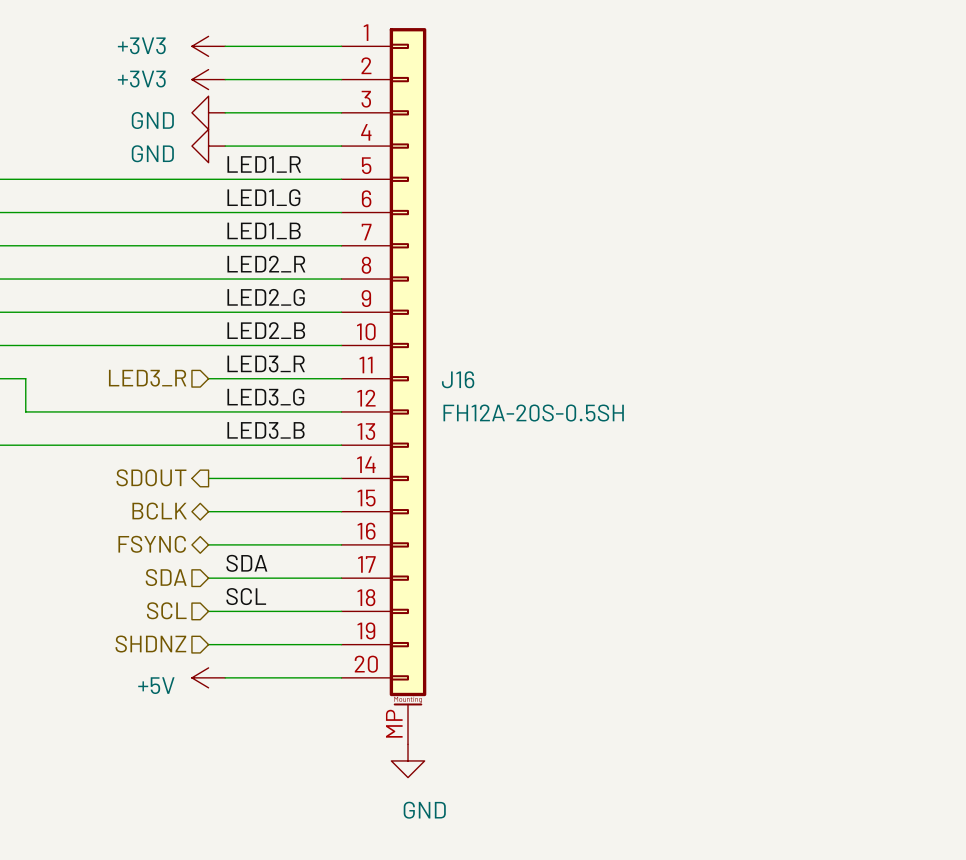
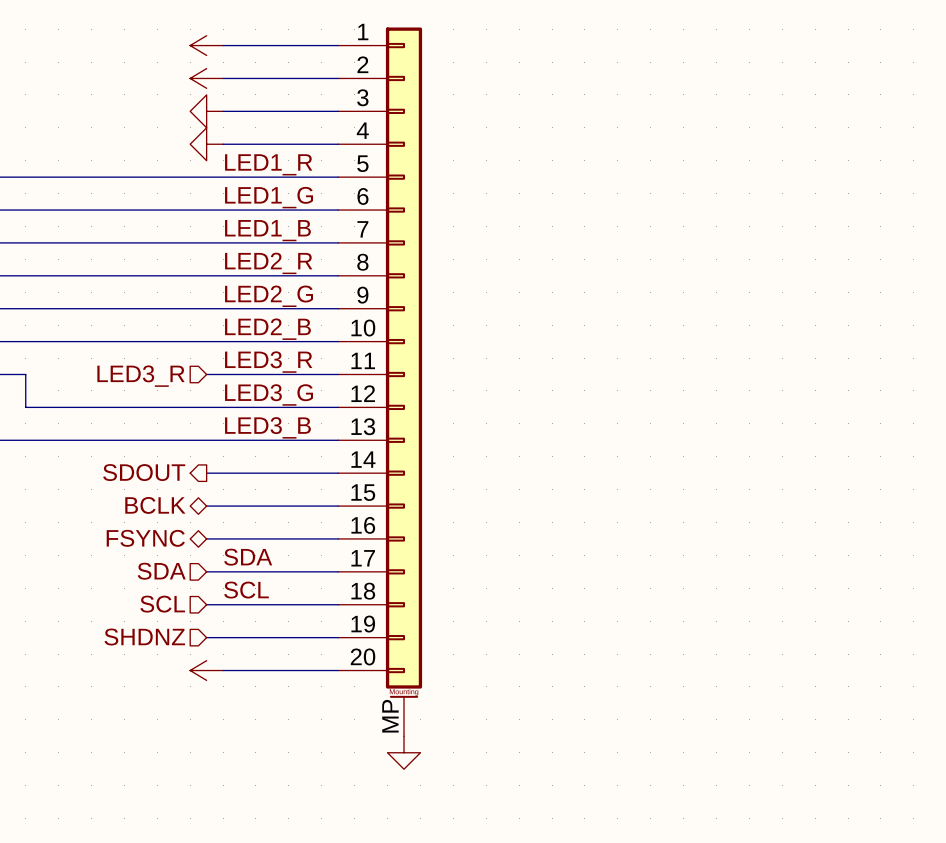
power symbol text: +3V3 (141, 45) -> none
power symbol text: +3V3 (141, 79) -> none
power symbol text: GND (152, 120) -> none
power symbol text: GND (152, 153) -> none
J16 name: J16 (458, 379) -> none
J16 value: FH12A-20S-0.5SH (533, 413) -> none
power symbol text: +5V (156, 685) -> none
power symbol text: GND (424, 810) -> none

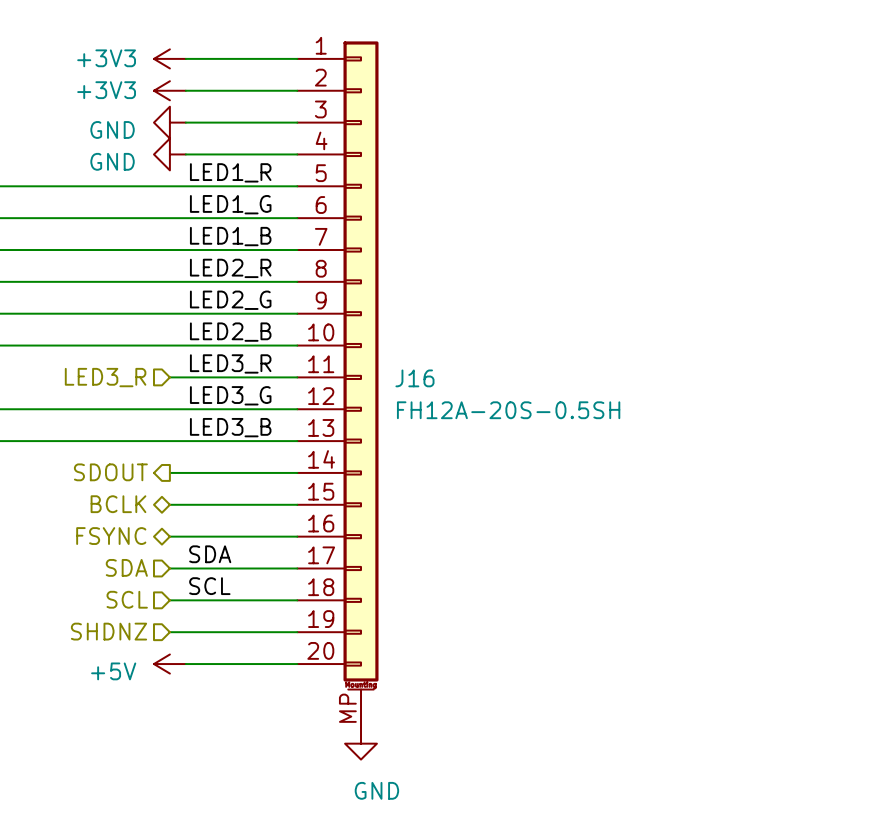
power symbol text: none -> +3V3 (106, 58)
power symbol text: none -> +3V3 (106, 90)
power symbol text: none -> GND (112, 129)
power symbol text: none -> GND (112, 161)
J16 name: none -> J16 (414, 378)
J16 value: none -> FH12A-20S-0.5SH (508, 410)
power symbol text: none -> +5V (113, 671)
power symbol text: none -> GND (376, 790)

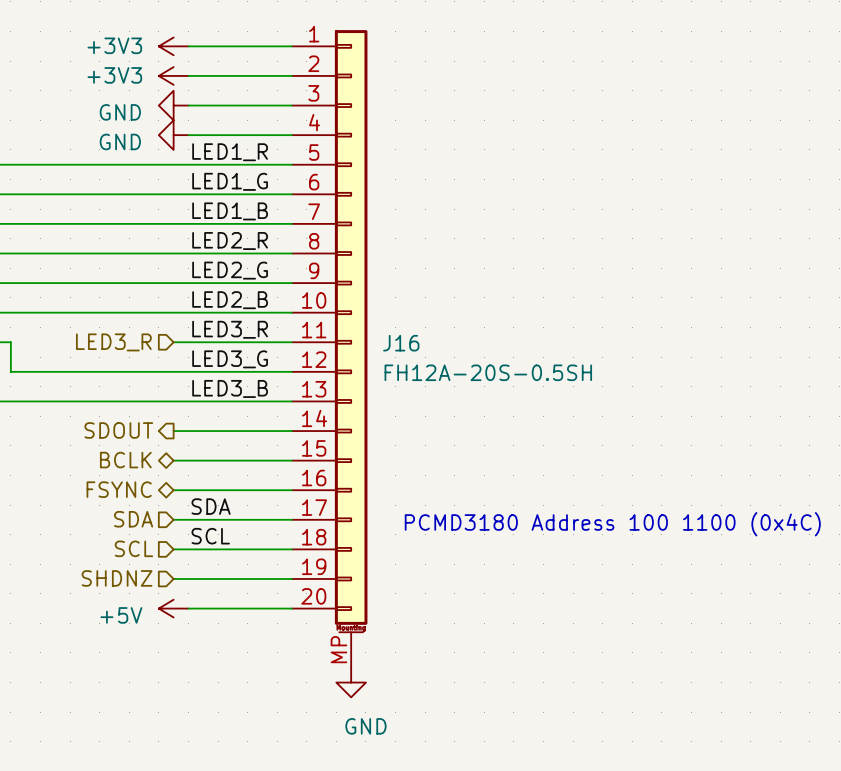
text: none -> PCMD3180 Address 100 1100 (0x4C) (612, 524)

